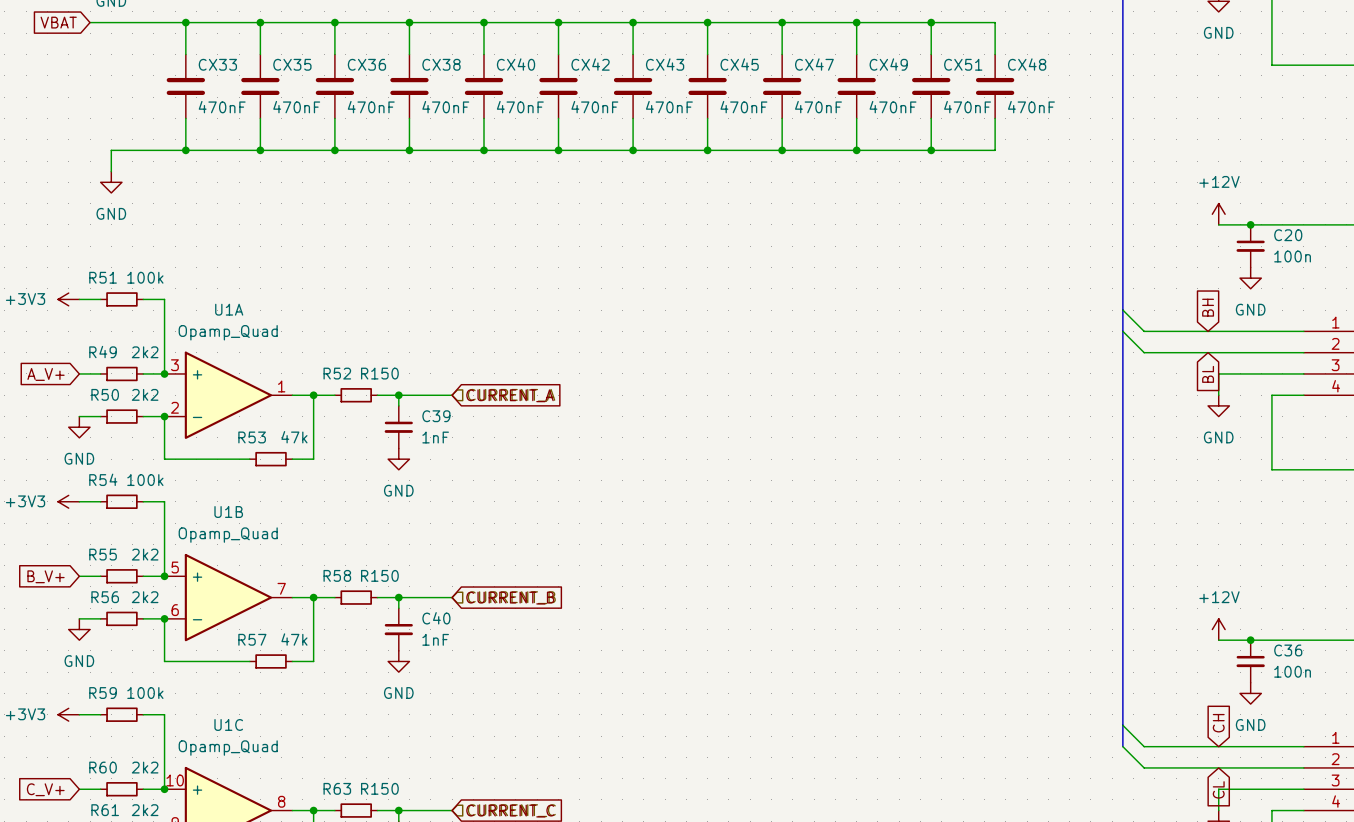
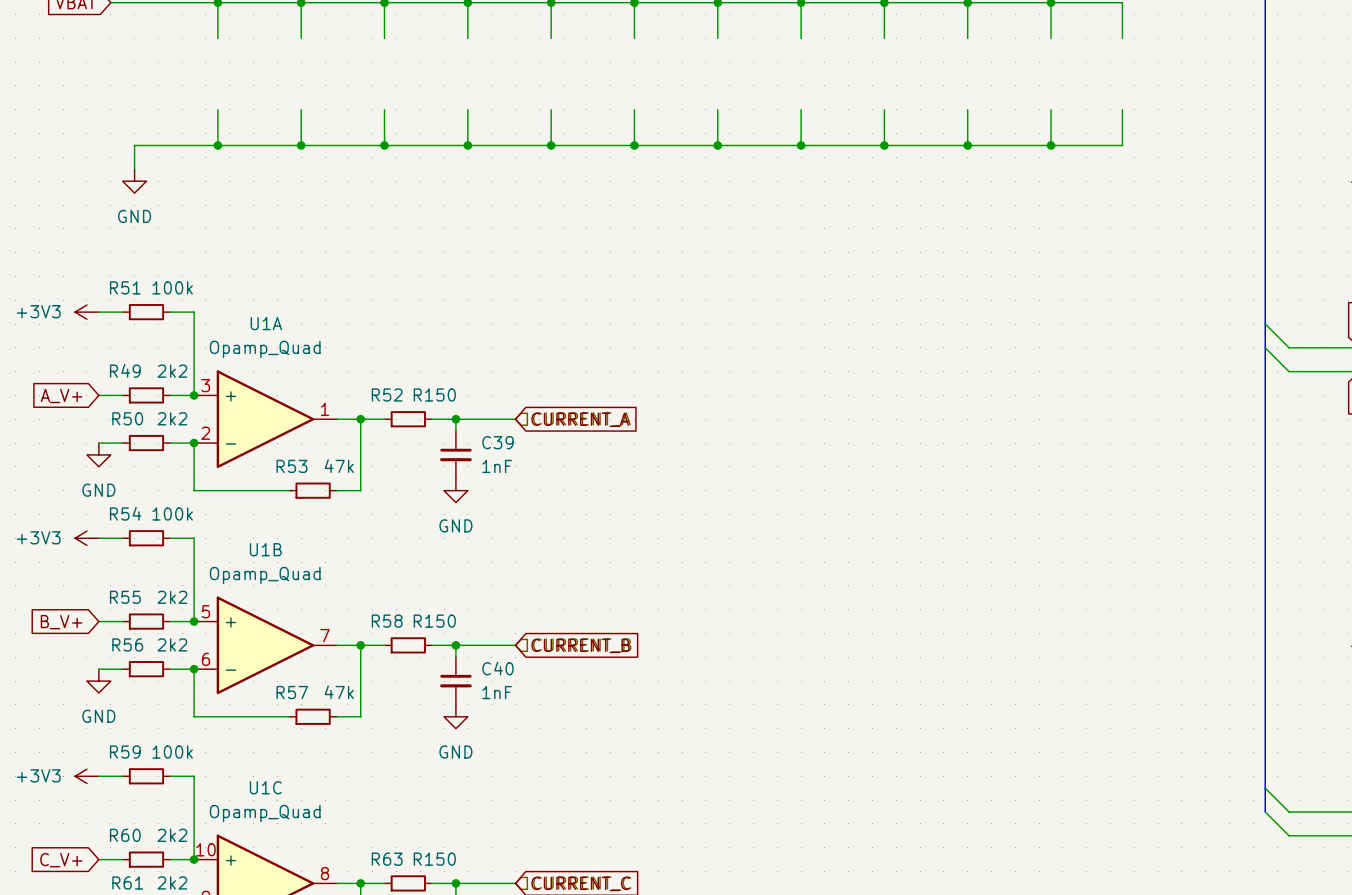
CX33: 470nF (185, 86) -> none
CX35: 470nF (260, 86) -> none
CX36: 470nF (334, 86) -> none
CX38: 470nF (409, 86) -> none
CX40: 470nF (483, 86) -> none
CX42: 470nF (558, 86) -> none
CX43: 470nF (633, 86) -> none
CX45: 470nF (707, 86) -> none
CX47: 470nF (782, 86) -> none
CX49: 470nF (856, 86) -> none
CX51: 470nF (931, 86) -> none
CX48: 470nF (995, 86) -> none

